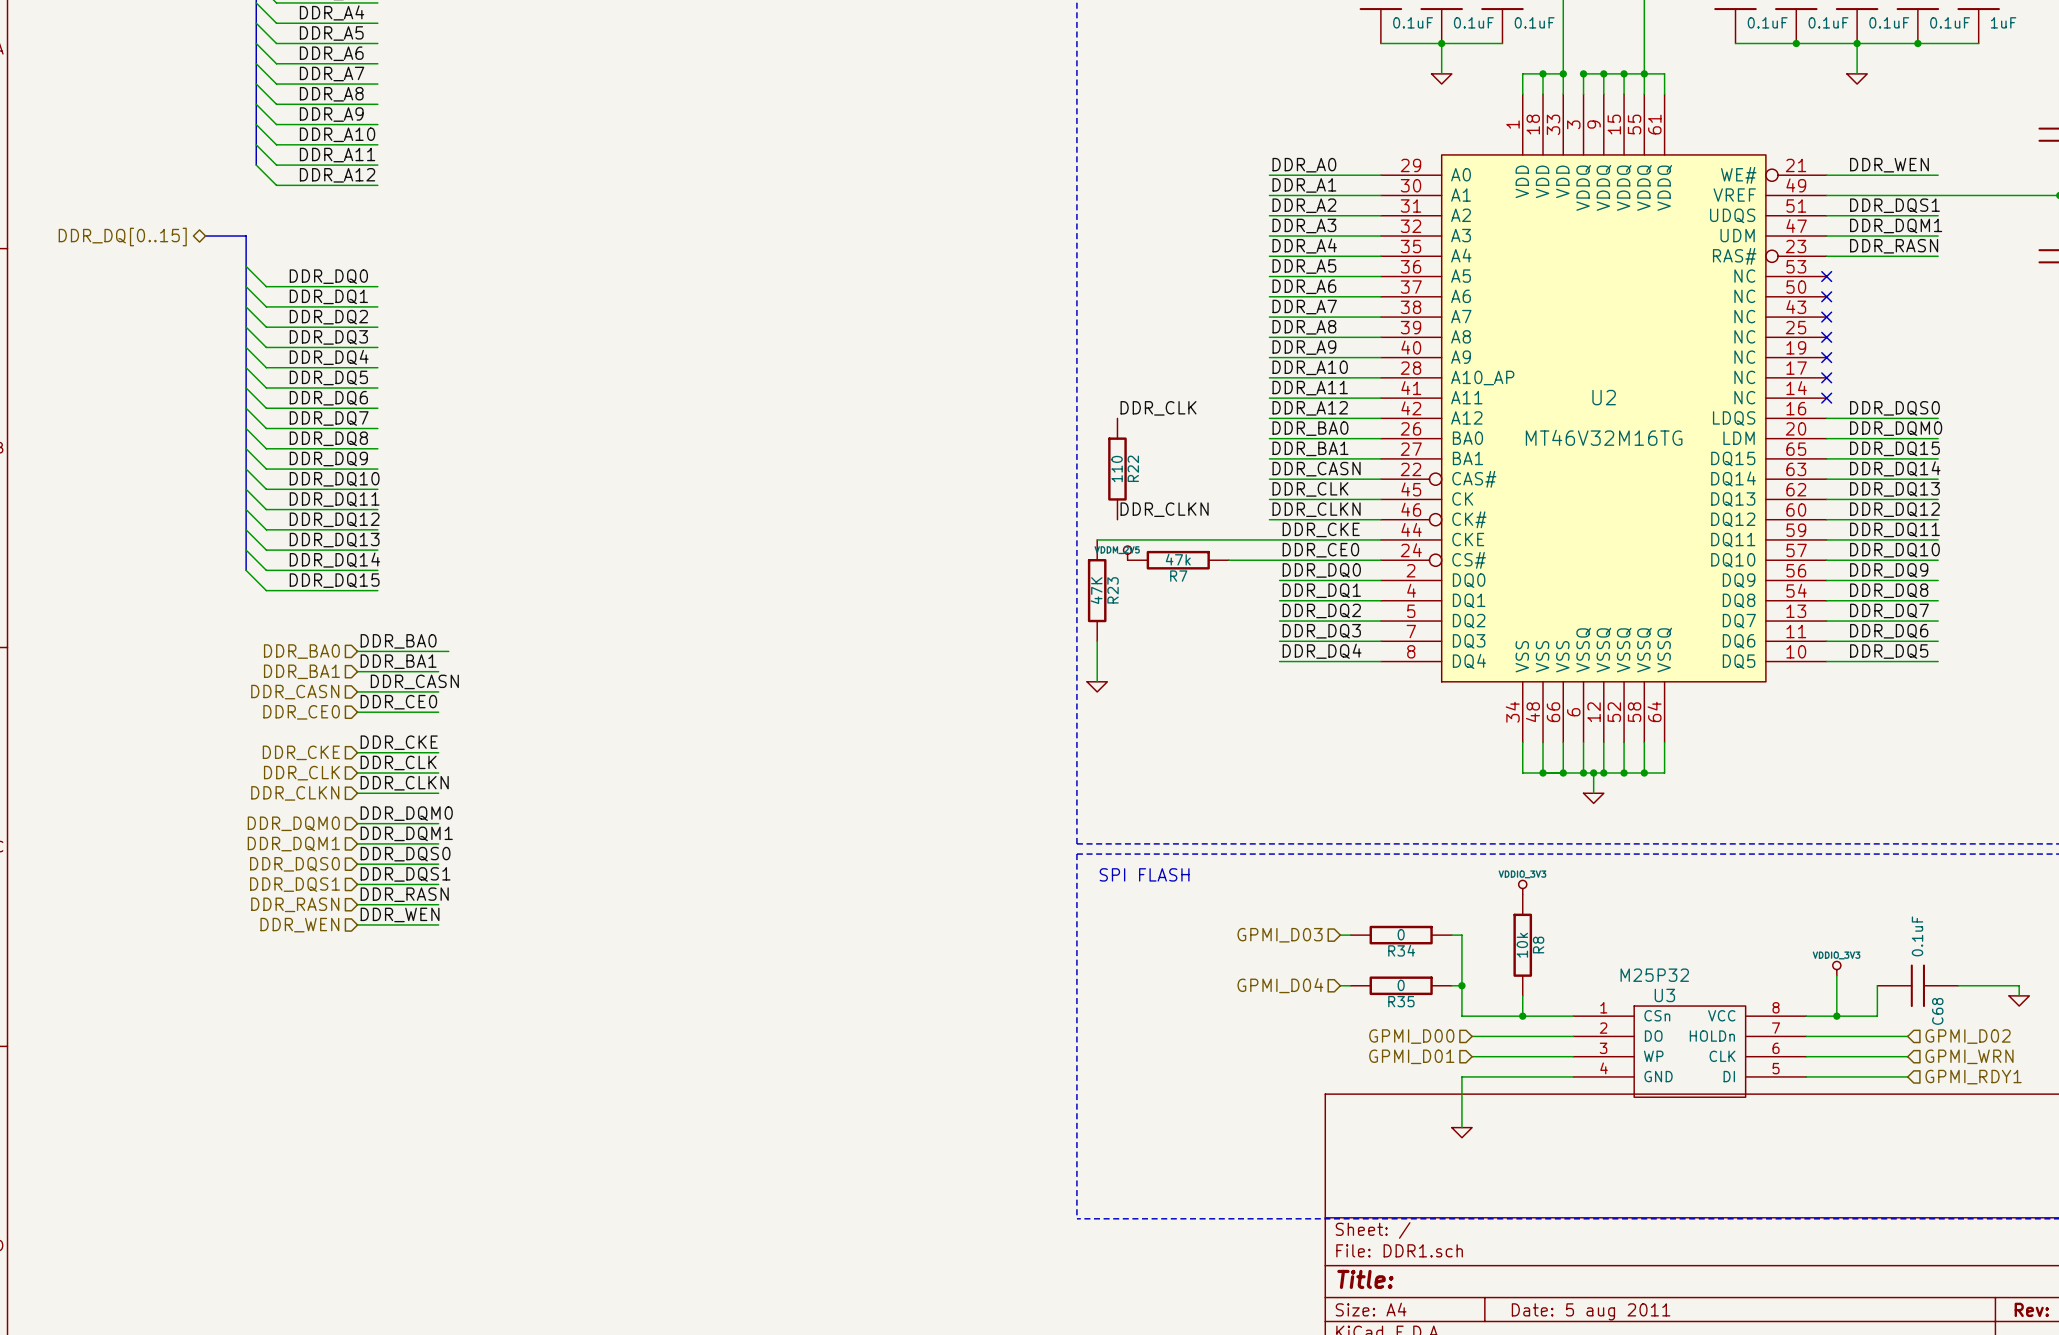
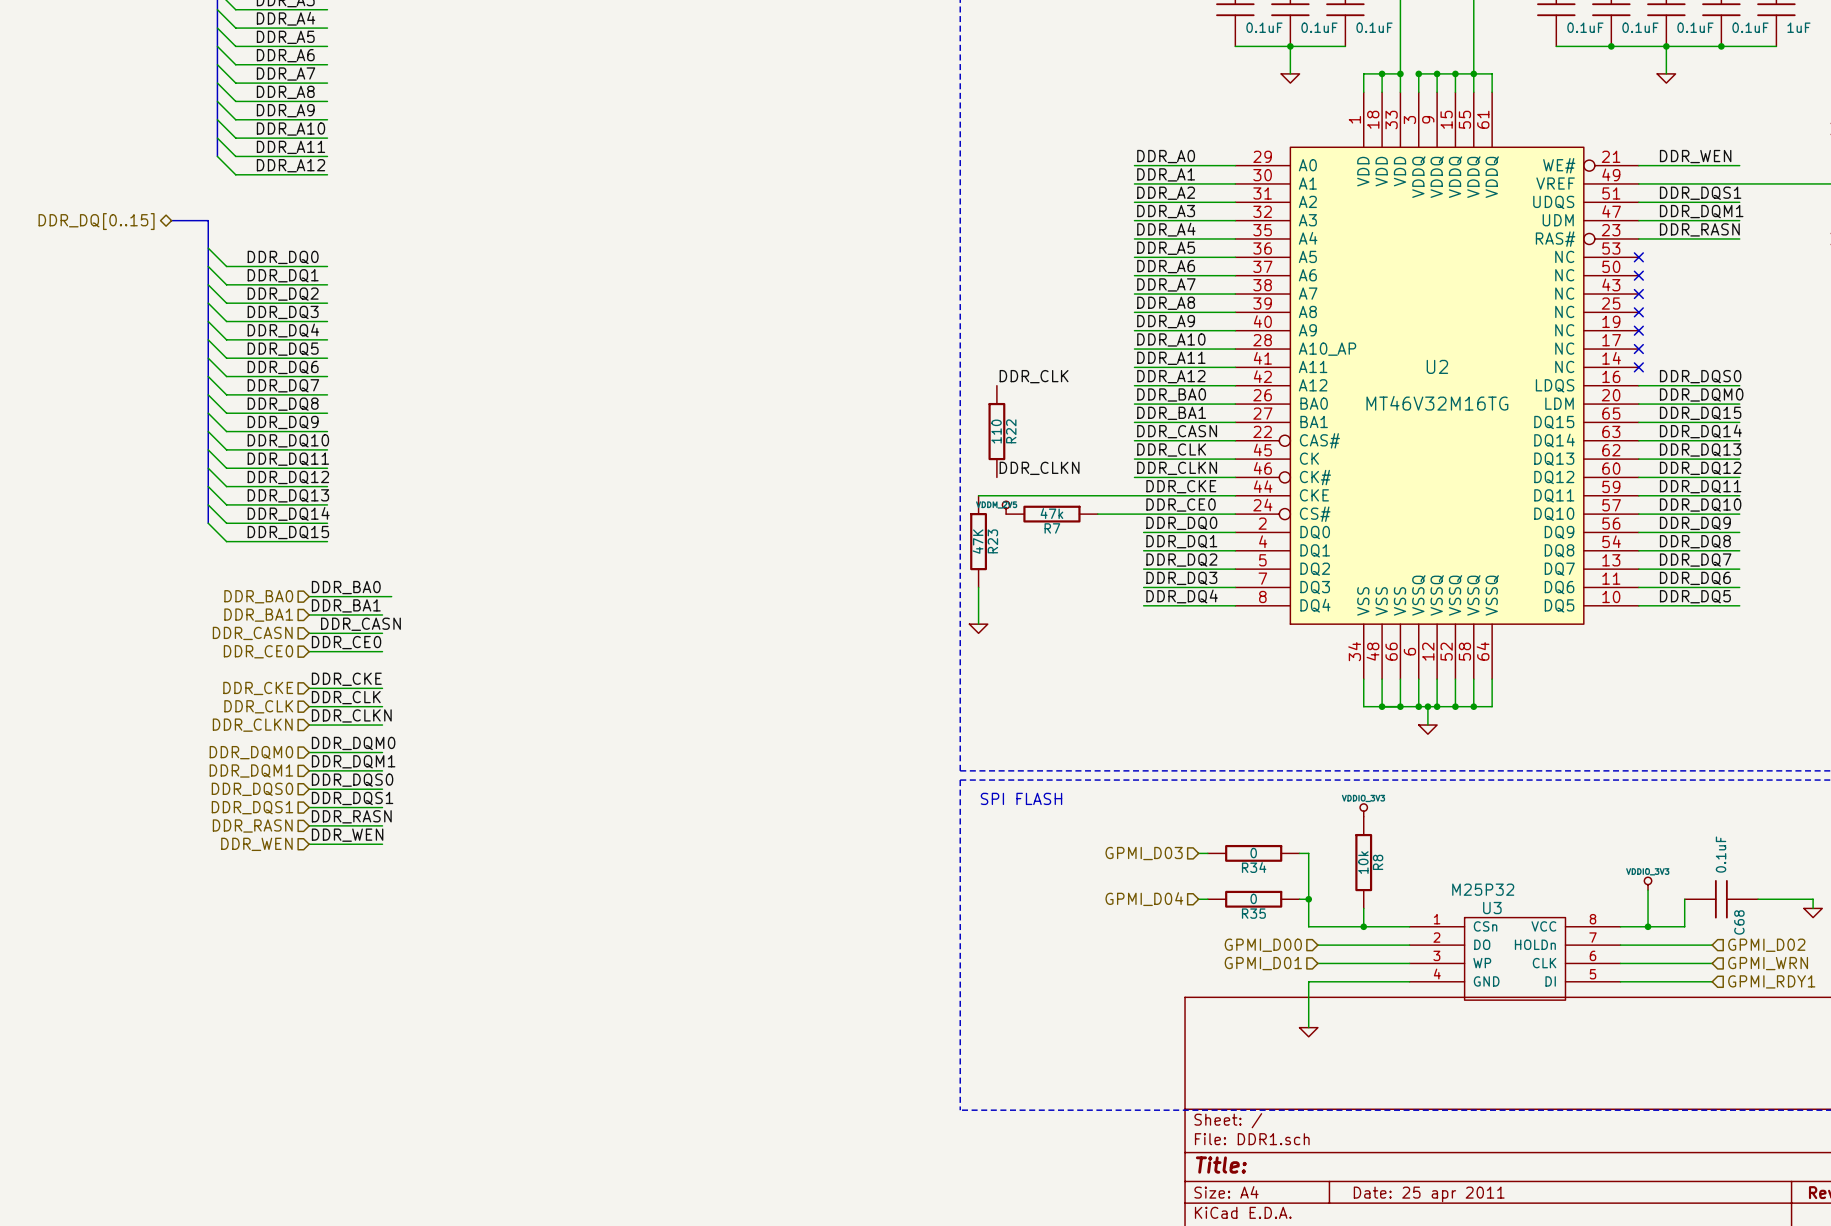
title block: Date: 5 aug 2011 (1591, 1311) -> Date: 25 apr 2011 (1429, 1194)

